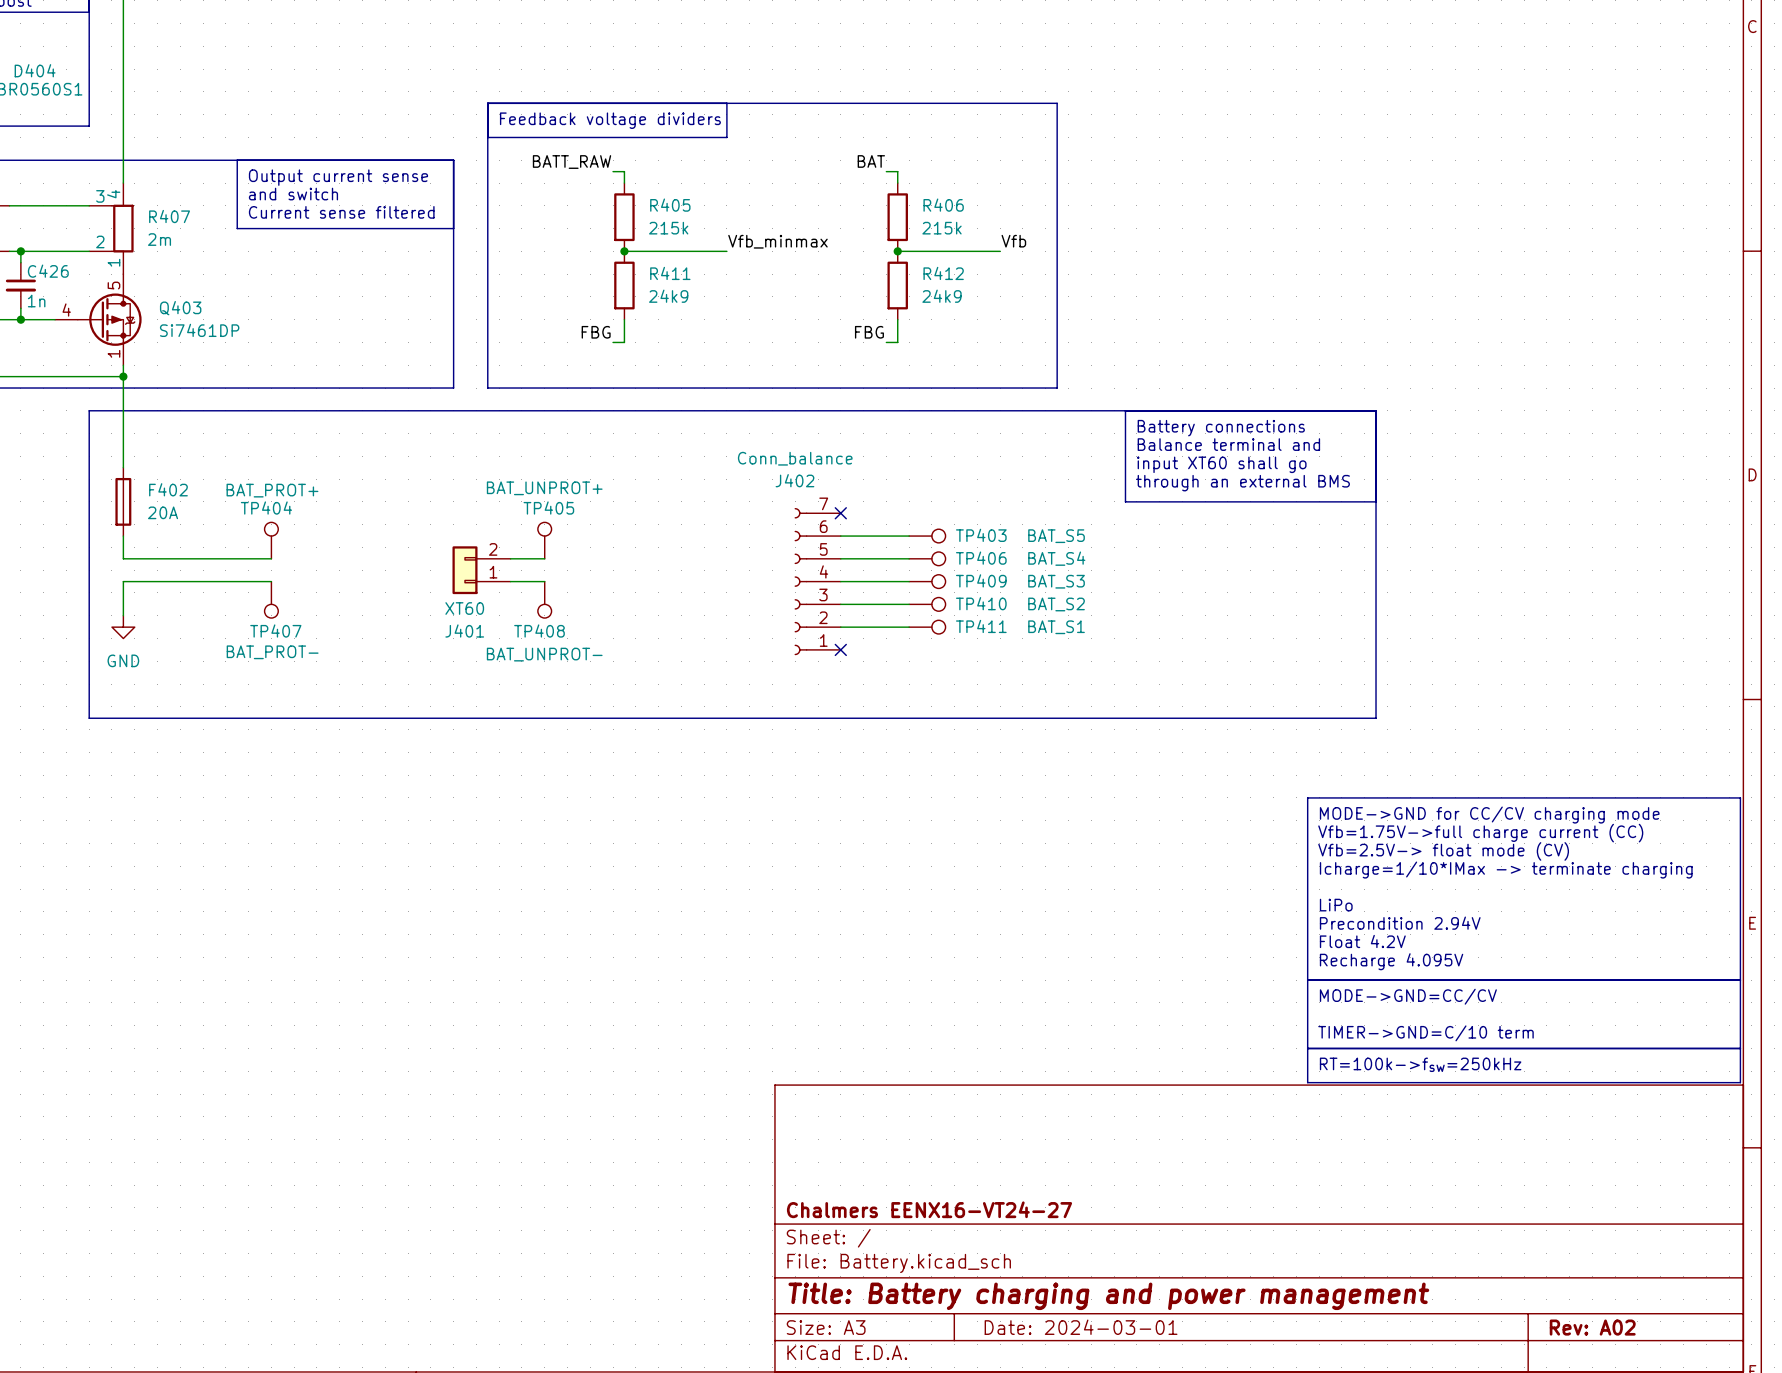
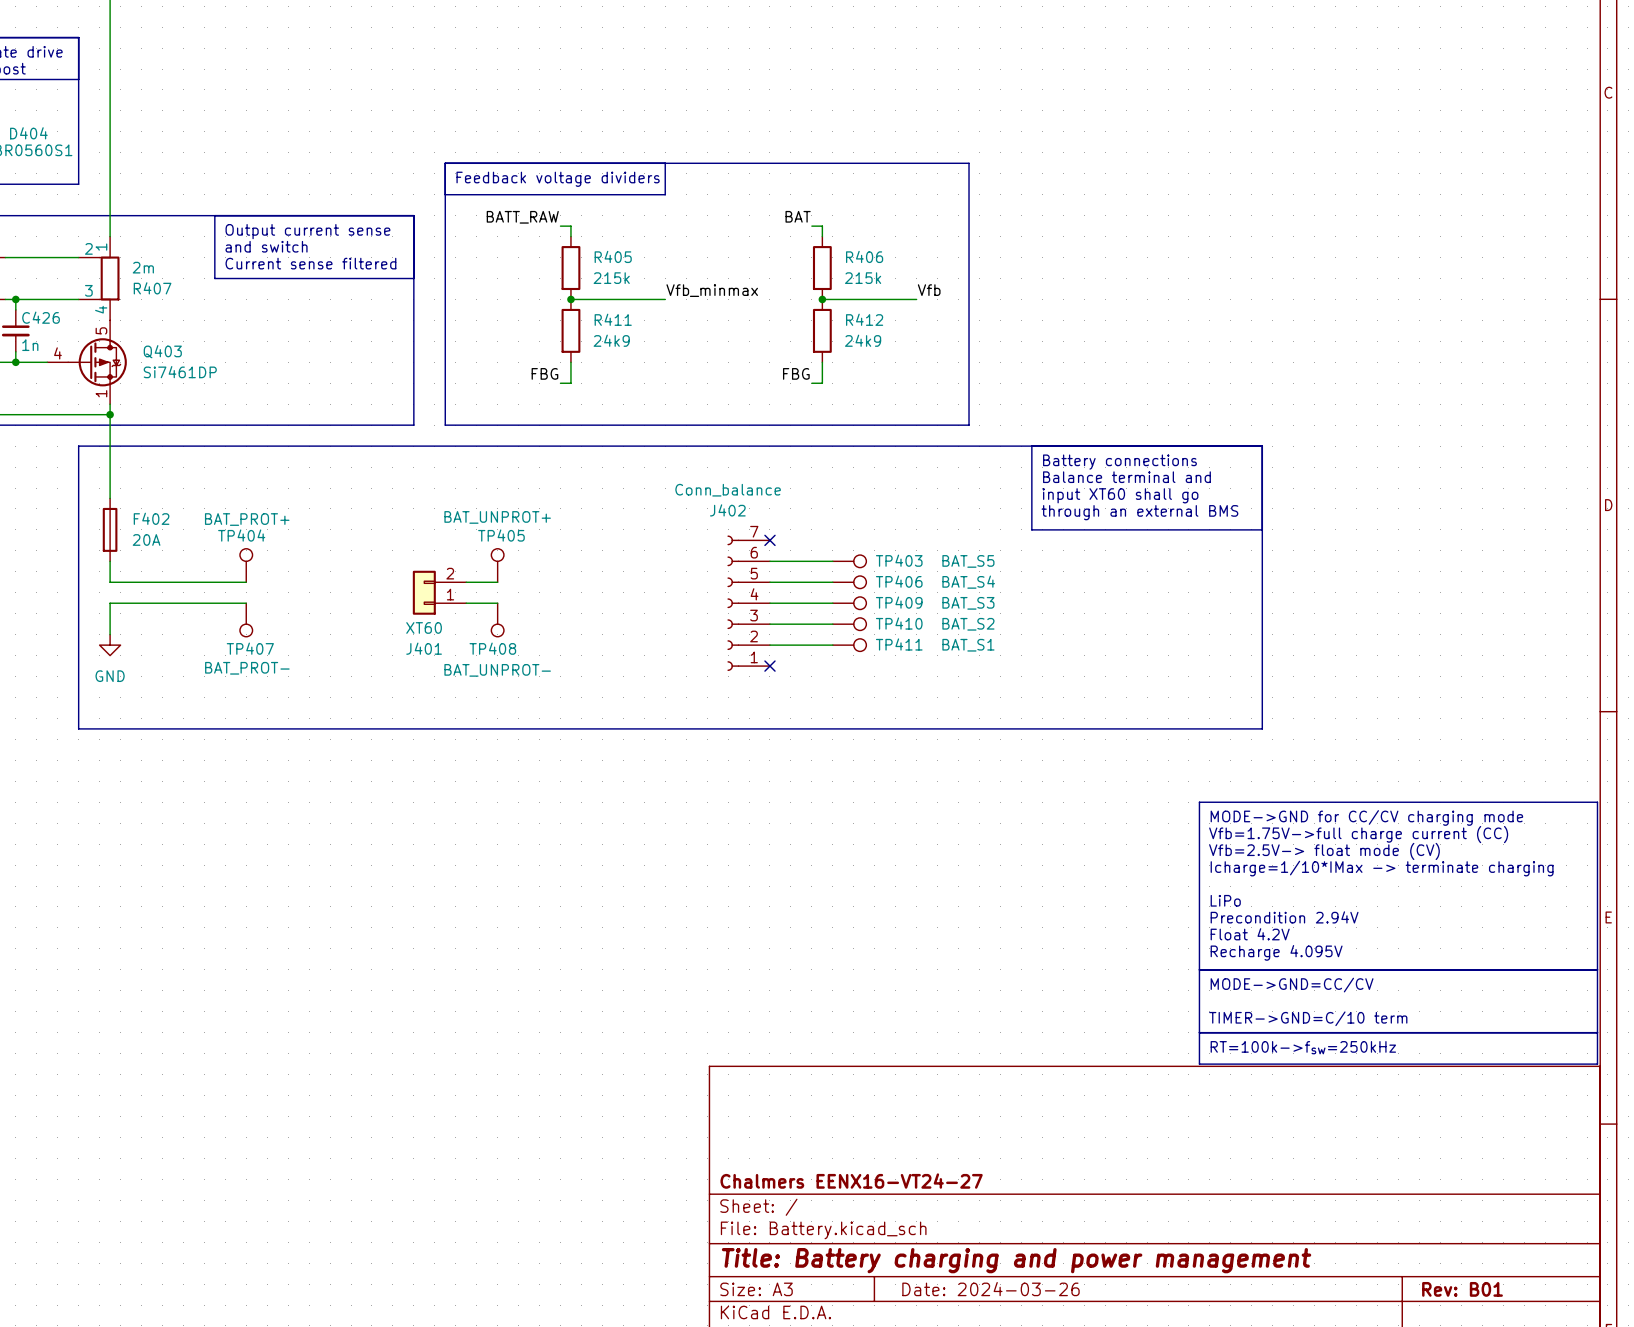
R407 flip: as is (122, 228) -> up-down (109, 278)
title block: Date: 2024-03-01 (1081, 1327) -> Date: 2024-03-26 (990, 1289)
title block: Rev: A02 (1592, 1327) -> Rev: B01 (1462, 1289)

